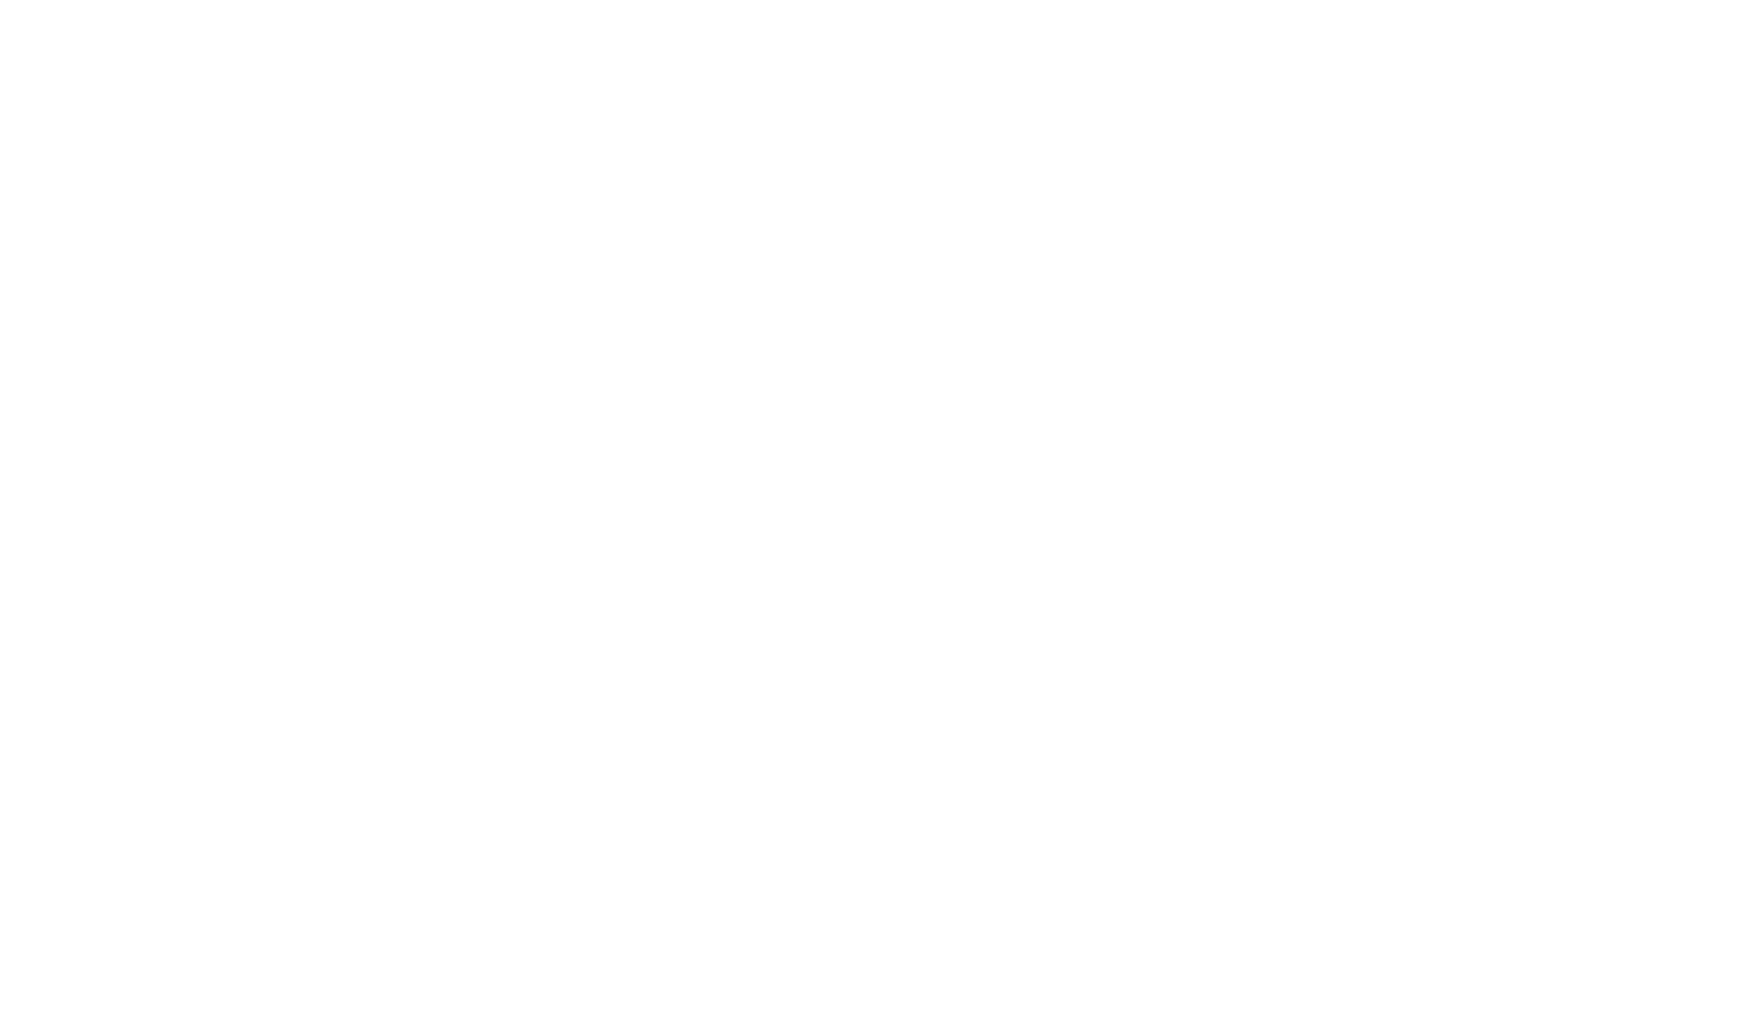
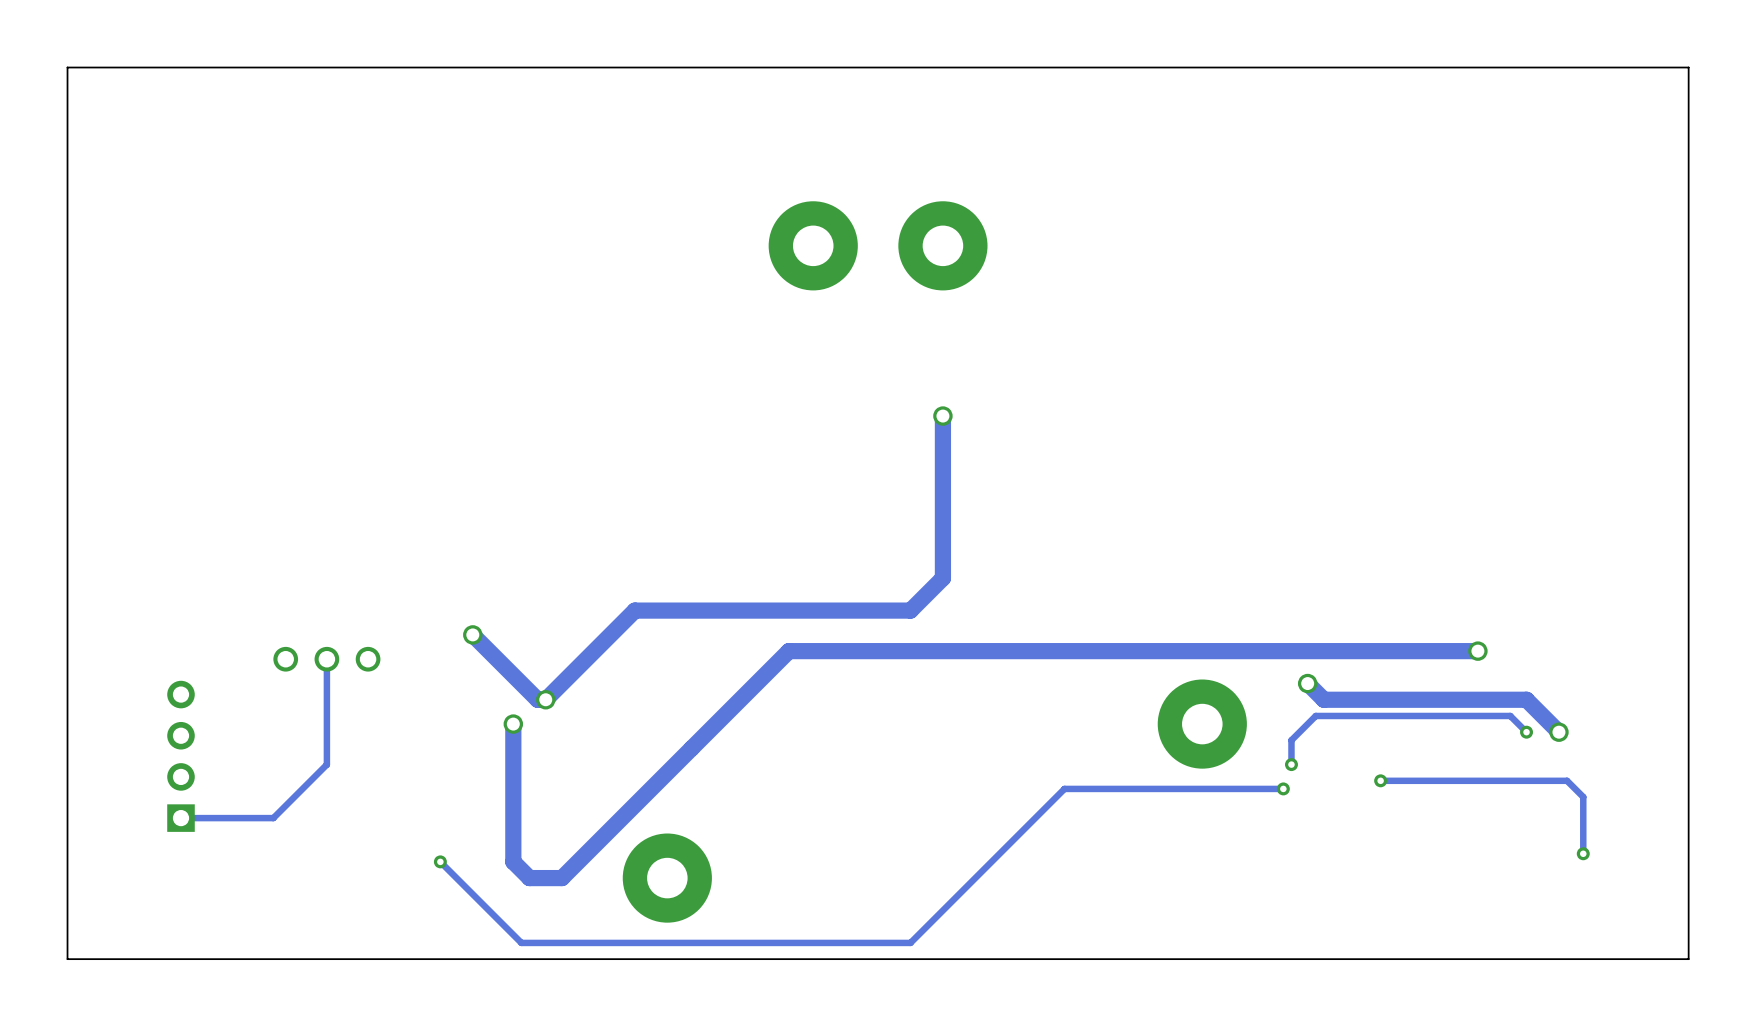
board edge: none -> (1688, 67) (1688, 959) (67, 959) (67, 67) (1688, 67)
part: none -> (813, 245)
part: none -> (942, 245)
track: none -> (942, 416) (942, 578) (910, 610) (634, 610) (545, 699) (537, 699) (472, 634)
via: none -> (942, 416)
via: none -> (472, 634)
track: none -> (1477, 651) (788, 651) (561, 878) (529, 878) (513, 861) (513, 724)
via: none -> (1477, 651)
track: none -> (326, 659) (326, 764) (273, 818) (180, 818)
part: none -> (326, 659)
track: none -> (1307, 683) (1323, 699) (1526, 699) (1558, 732)
via: none -> (1307, 683)
via: none -> (545, 699)
via: none -> (513, 724)
part: none -> (1202, 724)
track: none -> (1526, 732) (1510, 715) (1315, 715) (1291, 740) (1291, 764)
via: none -> (1526, 732)
via: none -> (1558, 732)
part: none -> (180, 756)
via: none -> (1291, 764)
track: none -> (1380, 780) (1567, 780) (1583, 797) (1583, 853)
via: none -> (1380, 780)
track: none -> (1283, 788) (1064, 788) (910, 942) (521, 942) (440, 861)
via: none -> (1283, 788)
via: none -> (1583, 853)
via: none -> (440, 861)
part: none -> (667, 878)

